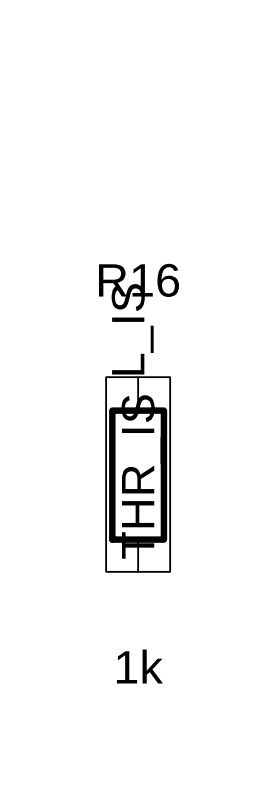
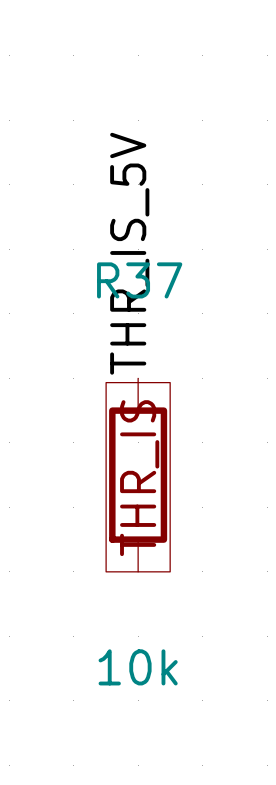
R16 name: R16 (139, 280) -> R37 (139, 280)
label: L_IS (132, 329) -> THR_IS_5V (129, 253)
R16 value: 1k (139, 666) -> 10k (138, 667)

